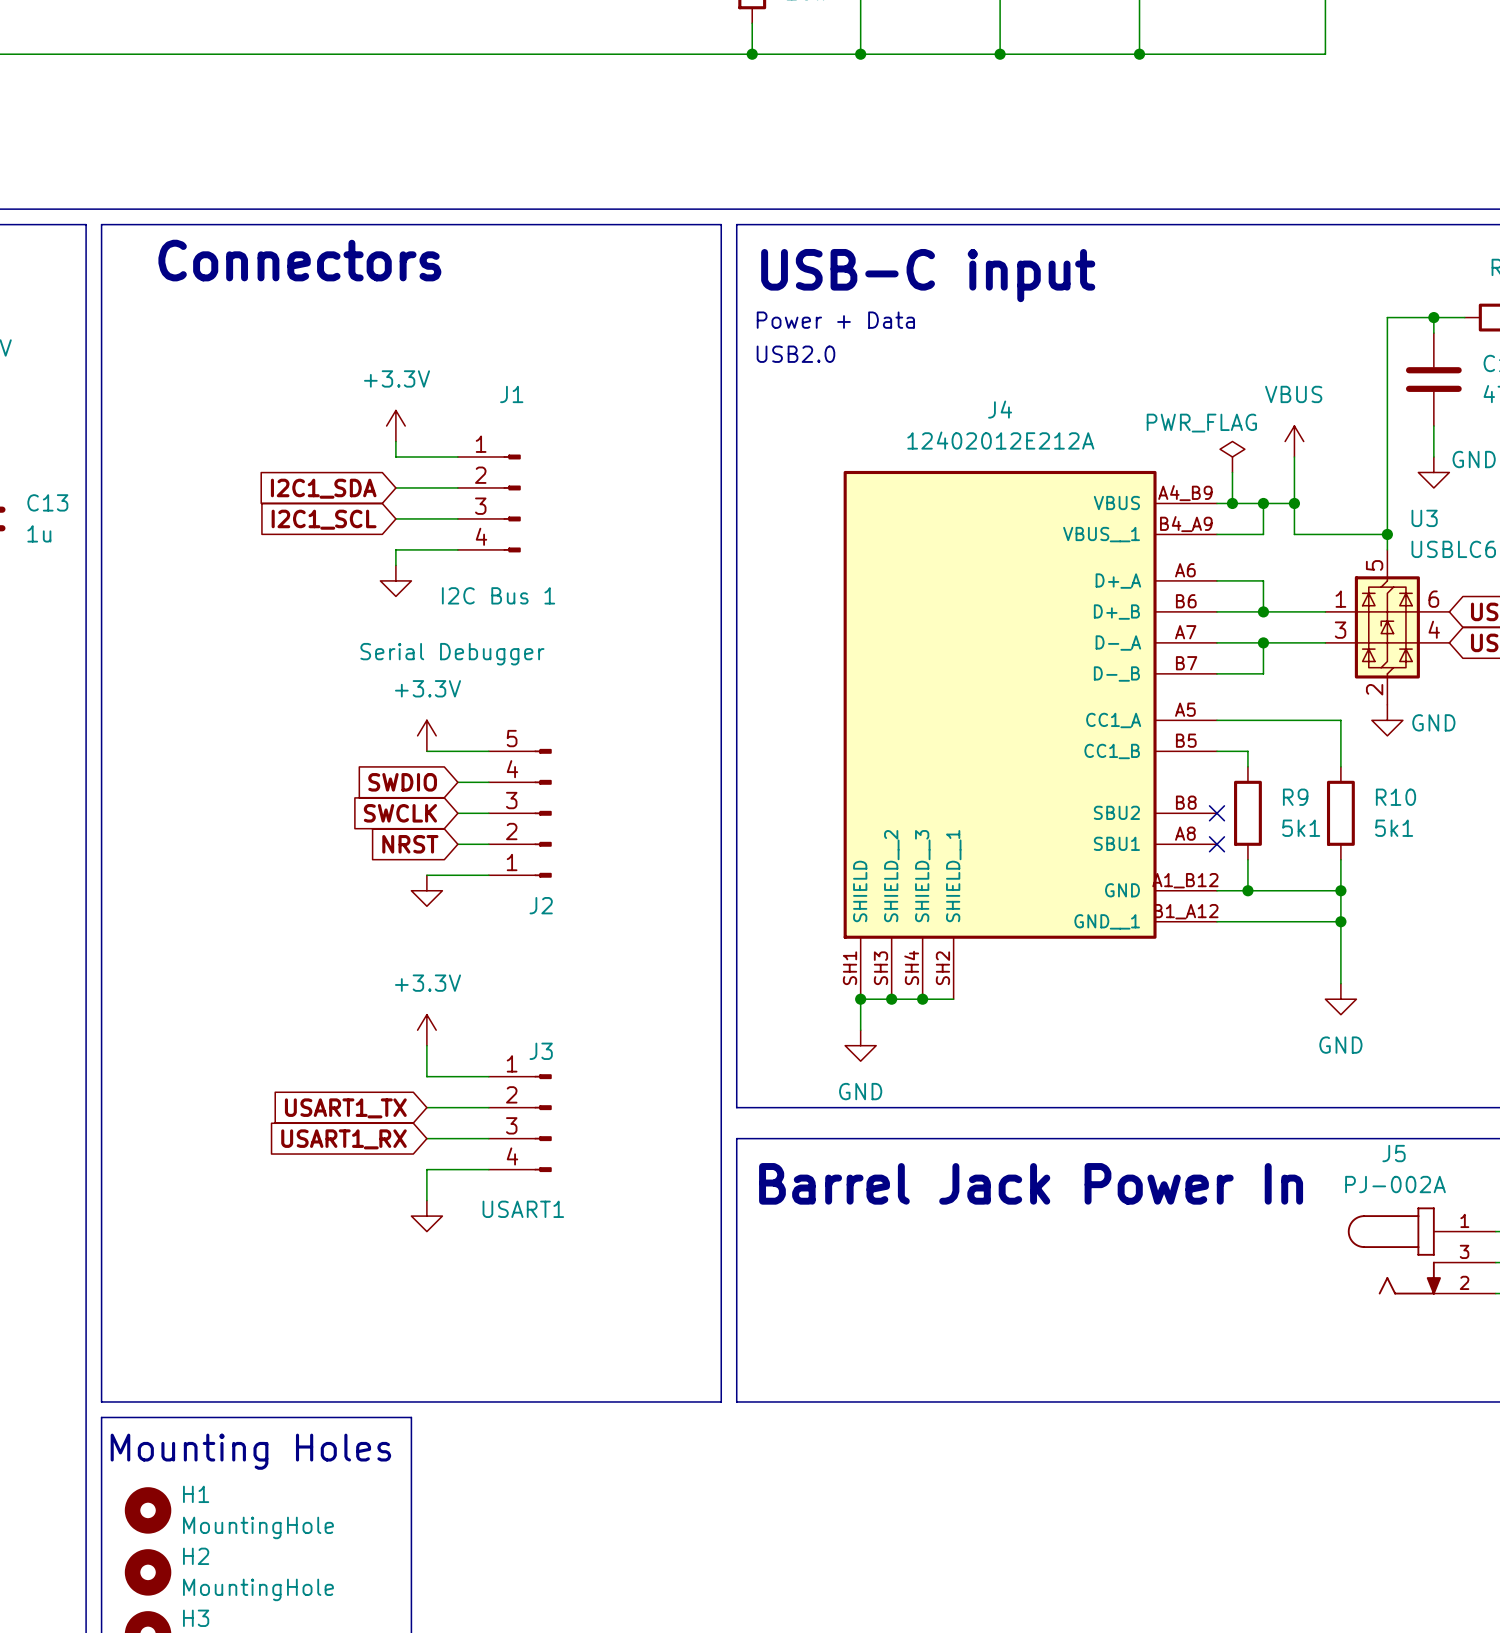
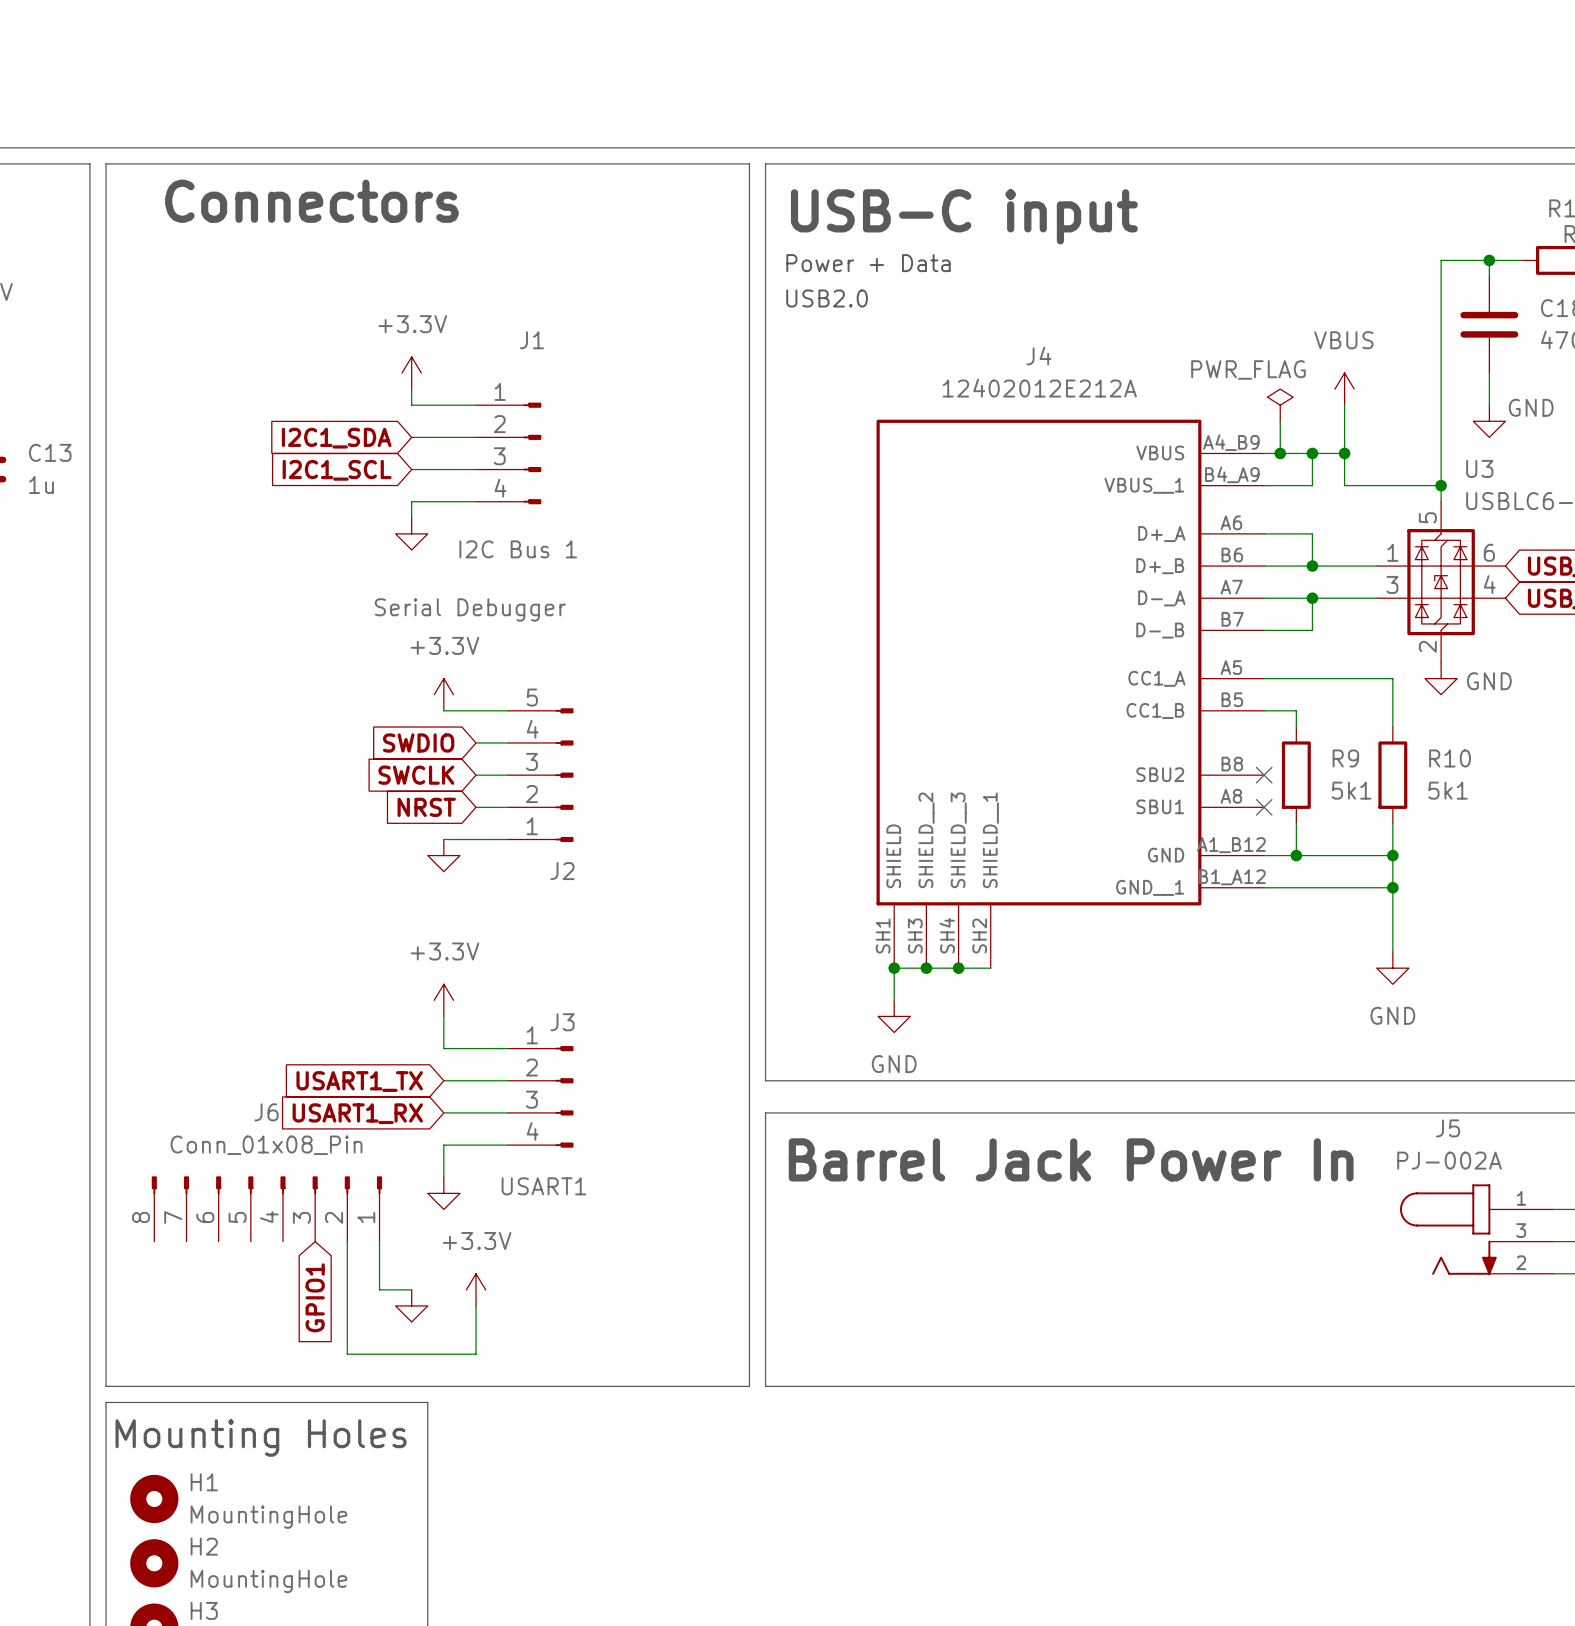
J6: none -> Conn_01x08_Pin (266, 1208)
wire: none -> (347, 1241) (347, 1354) (476, 1354) (476, 1305)
wire: none -> (379, 1241) (379, 1289) (411, 1289)
power symbol: none -> +3.3V (476, 1289)
global label: none -> GPIO1 (315, 1297)
power symbol: none -> (411, 1305)

